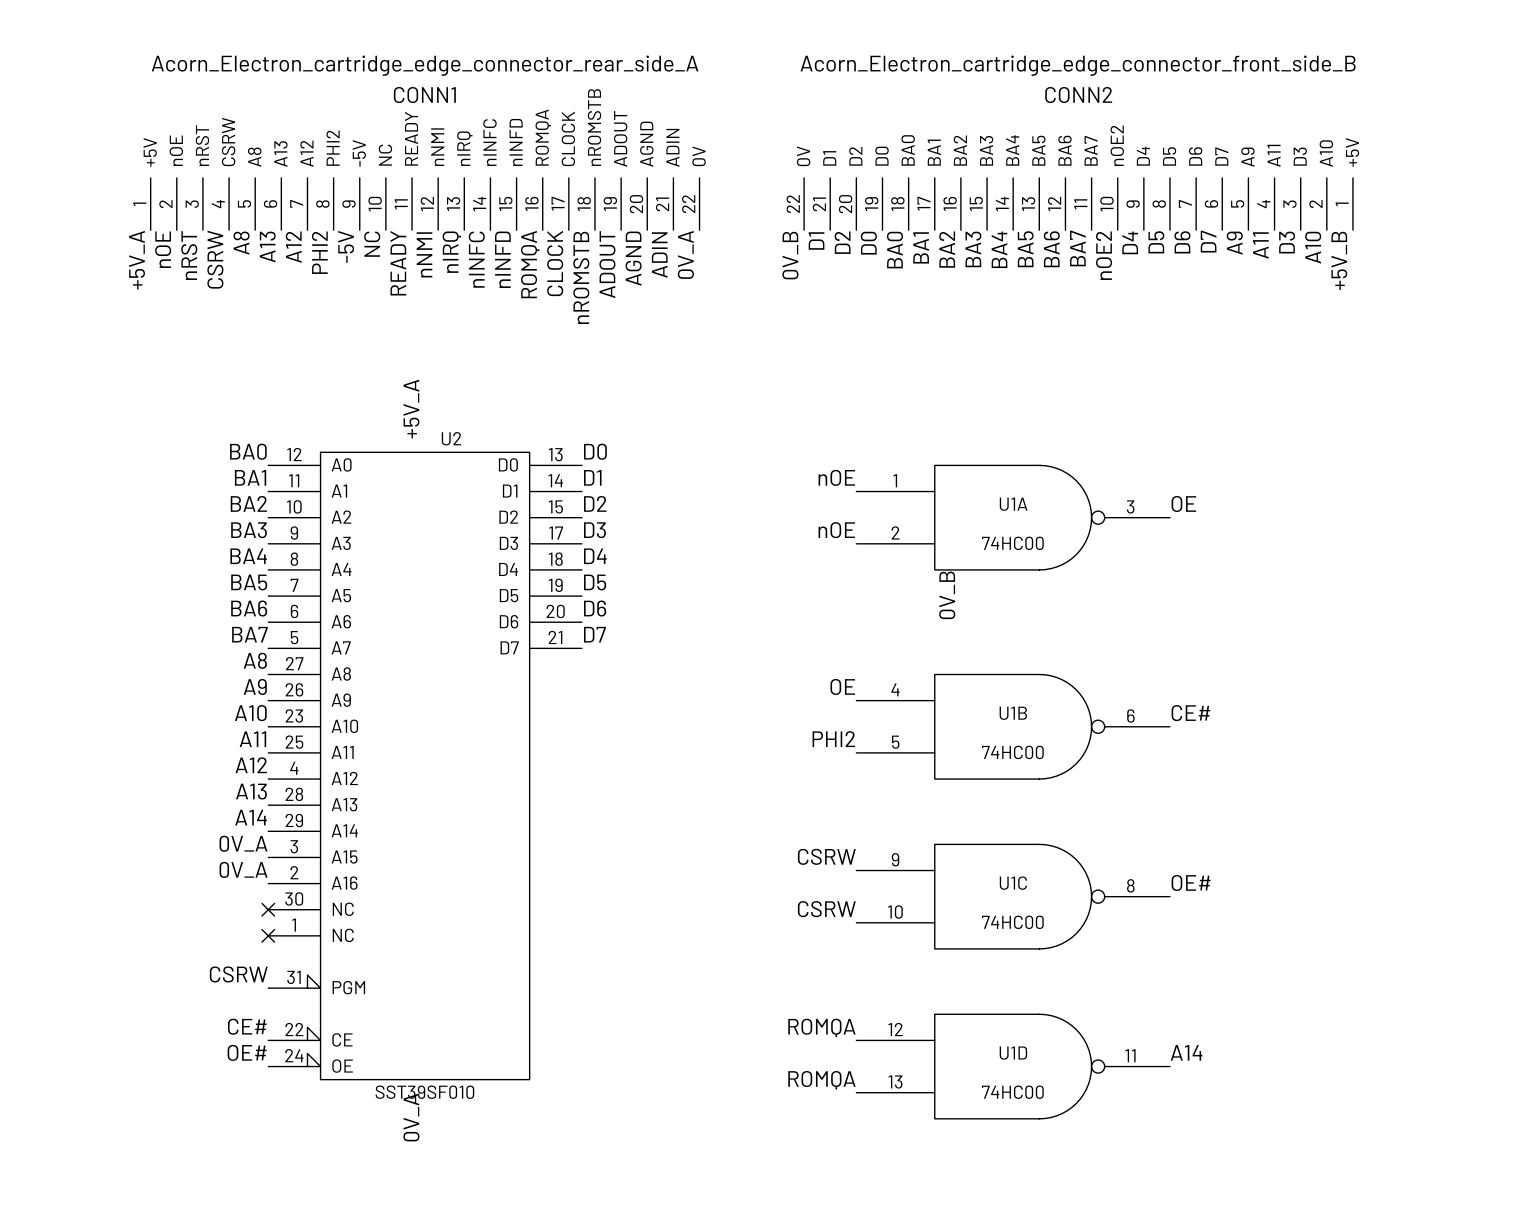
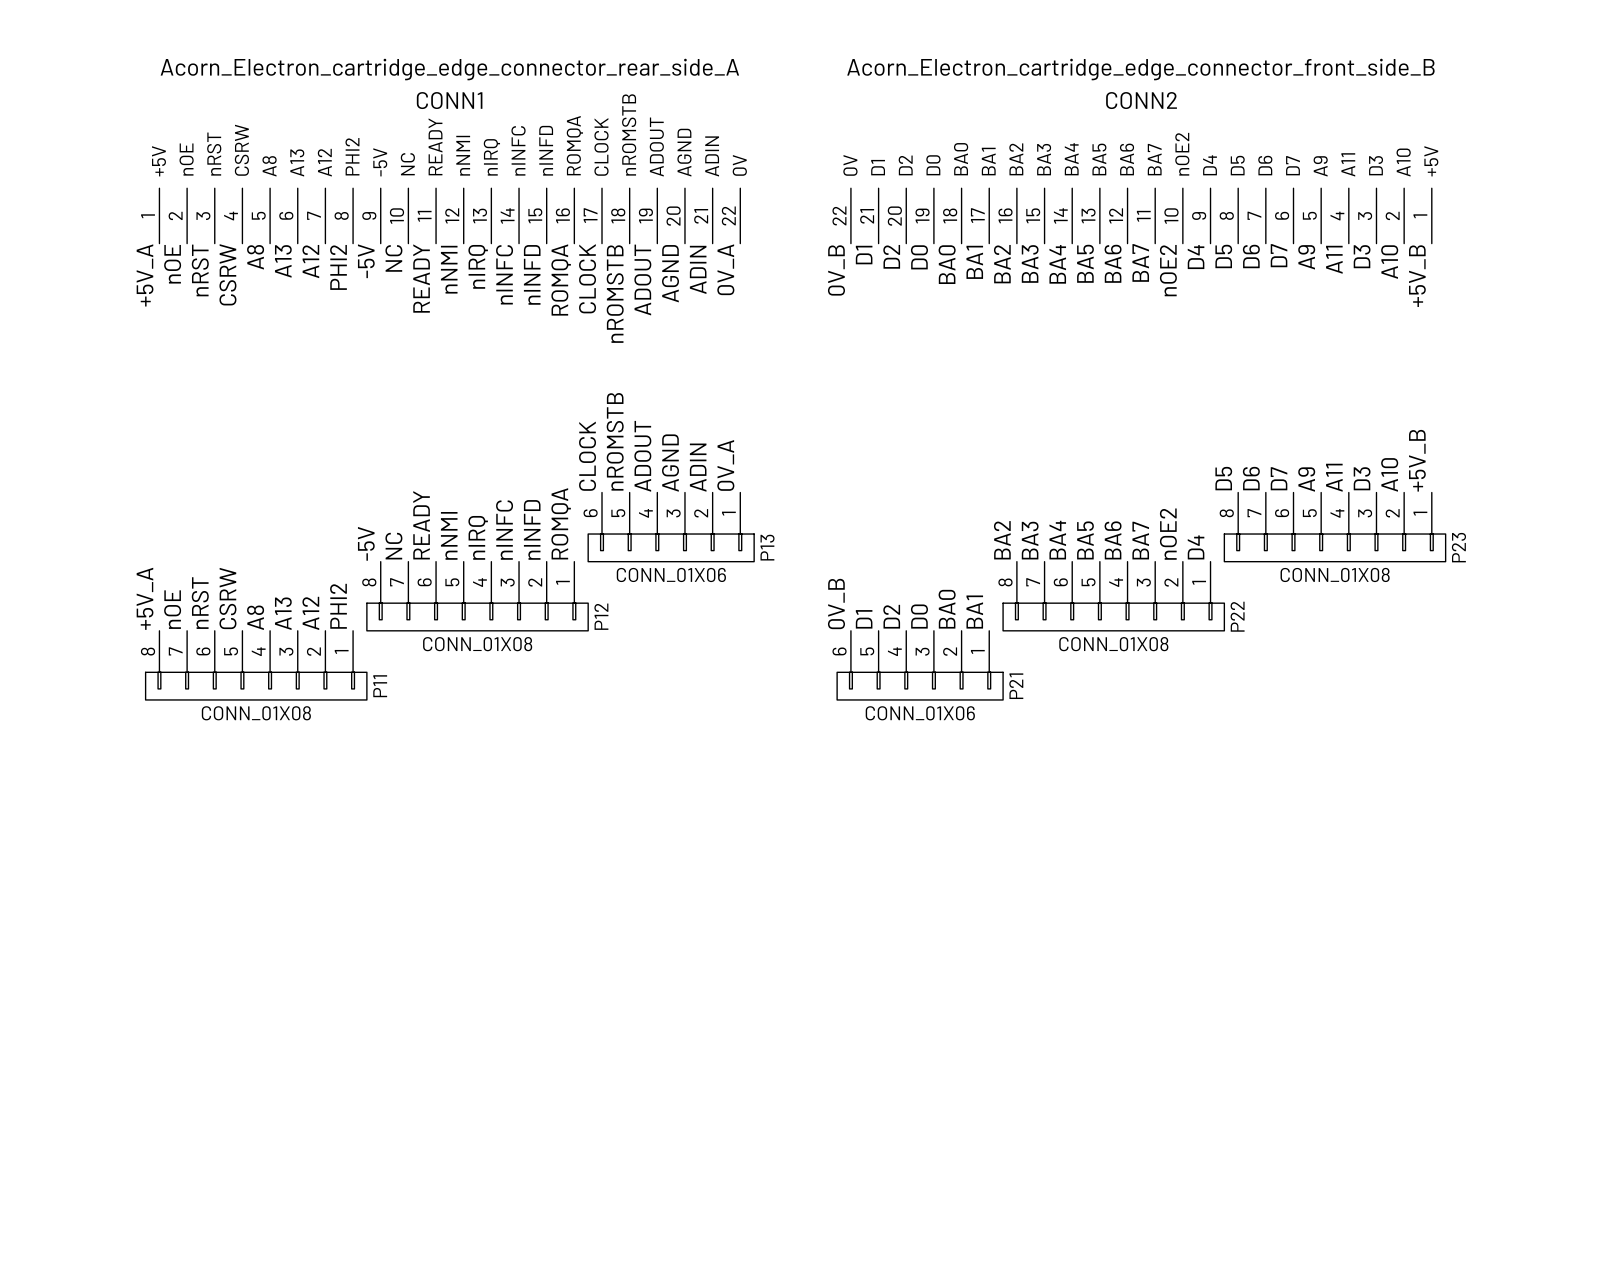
label: +5V_A (411, 409) -> none
label: none -> nROMSTB (615, 441)
label: none -> CLOCK (587, 456)
label: none -> ADOUT (642, 456)
label: none -> +5V_B (1417, 460)
label: none -> AGND (670, 463)
label: none -> 0V_A (725, 465)
label: none -> ADIN (698, 467)
label: none -> A10 (1389, 474)
label: BA0 (248, 451) -> none
label: D0 (595, 451) -> none
label: none -> A11 (1334, 477)
label: none -> D5 (1223, 478)
label: none -> D6 (1251, 478)
label: none -> D7 (1279, 478)
label: none -> D3 (1362, 478)
label: none -> A9 (1306, 479)
label: BA1 (250, 477) -> none
label: D1 (592, 477) -> none
label: nOE (836, 477) -> none
label: none -> ROMQA (561, 523)
label: none -> READY (421, 525)
P13: none -> CONN_01X06 (671, 527)
P23: none -> CONN_01X08 (1334, 527)
label: none -> nINFC (504, 530)
label: none -> nINFD (532, 529)
label: BA2 (248, 503) -> none
label: D2 (595, 503) -> none
label: OE (1183, 503) -> none
label: none -> nOE2 (1168, 534)
label: none -> nNMI (449, 535)
label: none -> nIRQ (478, 537)
label: none -> BA2 (1002, 540)
label: none -> BA3 (1030, 540)
label: none -> BA4 (1057, 540)
label: none -> BA5 (1085, 540)
label: none -> BA6 (1113, 540)
label: none -> BA7 (1140, 540)
label: none -> -5V (366, 543)
label: none -> NC (393, 546)
U1A: 74HC00 (1013, 517) -> none
label: none -> D4 (1196, 547)
label: BA3 (249, 530) -> none
label: D3 (594, 530) -> none
label: nOE (836, 530) -> none
label: BA4 (248, 556) -> none
label: D4 (595, 556) -> none
P12: none -> CONN_01X08 (477, 596)
P22: none -> CONN_01X08 (1113, 596)
label: none -> +5V_A (145, 598)
label: none -> CSRW (227, 598)
label: none -> nRST (200, 603)
label: none -> PHI2 (338, 606)
label: none -> BA0 (947, 609)
label: none -> nOE (172, 609)
label: none -> BA1 (974, 612)
label: BA5 (249, 582) -> none
label: D5 (595, 582) -> none
label: none -> D2 (891, 616)
label: none -> D0 (919, 616)
label: none -> D1 (864, 619)
label position: 0V_B (947, 595) -> 0V_B (836, 603)
label: BA6 (249, 608) -> none
label: D6 (595, 608) -> none
P11: none -> CONN_01X08 (256, 665)
P21: none -> CONN_01X06 (920, 665)
label: BA7 (249, 634) -> none
label: D7 (594, 634) -> none
label rotation: 0° (255, 660) -> 90° counterclockwise (255, 617)
label position: A8 (255, 660) -> A8 (255, 617)
label: A9 (255, 686) -> none
label: OE (842, 686) -> none
label: A10 (250, 713) -> none
label: CE# (1190, 713) -> none
U1B: 74HC00 (1013, 726) -> none
label: A11 (252, 739) -> none
label: PHI2 (833, 739) -> none
label rotation: 0° (251, 765) -> 90° counterclockwise (310, 613)
label position: A12 (251, 765) -> A12 (310, 613)
U2: SST39SF010 (425, 765) -> none
label rotation: 0° (251, 791) -> 90° counterclockwise (283, 613)
label position: A13 (251, 791) -> A13 (283, 613)
label: A14 (251, 817) -> none
label: 0V_A (243, 843) -> none
label: CSRW (826, 856) -> none
label: 0V_A (243, 869) -> none
label: OE# (1191, 882) -> none
U1C: 74HC00 (1013, 896) -> none
no-connect mark: (268, 909) -> none
label: CSRW (826, 909) -> none
no-connect mark: (268, 935) -> none
label: CSRW (238, 974) -> none
label: CE# (247, 1026) -> none
label: ROMQA (821, 1027) -> none
label: OE# (247, 1052) -> none
label: A14 (1186, 1052) -> none
U1D: 74HC00 (1013, 1066) -> none
label: ROMQA (821, 1080) -> none
label: 0V_A (411, 1117) -> none

